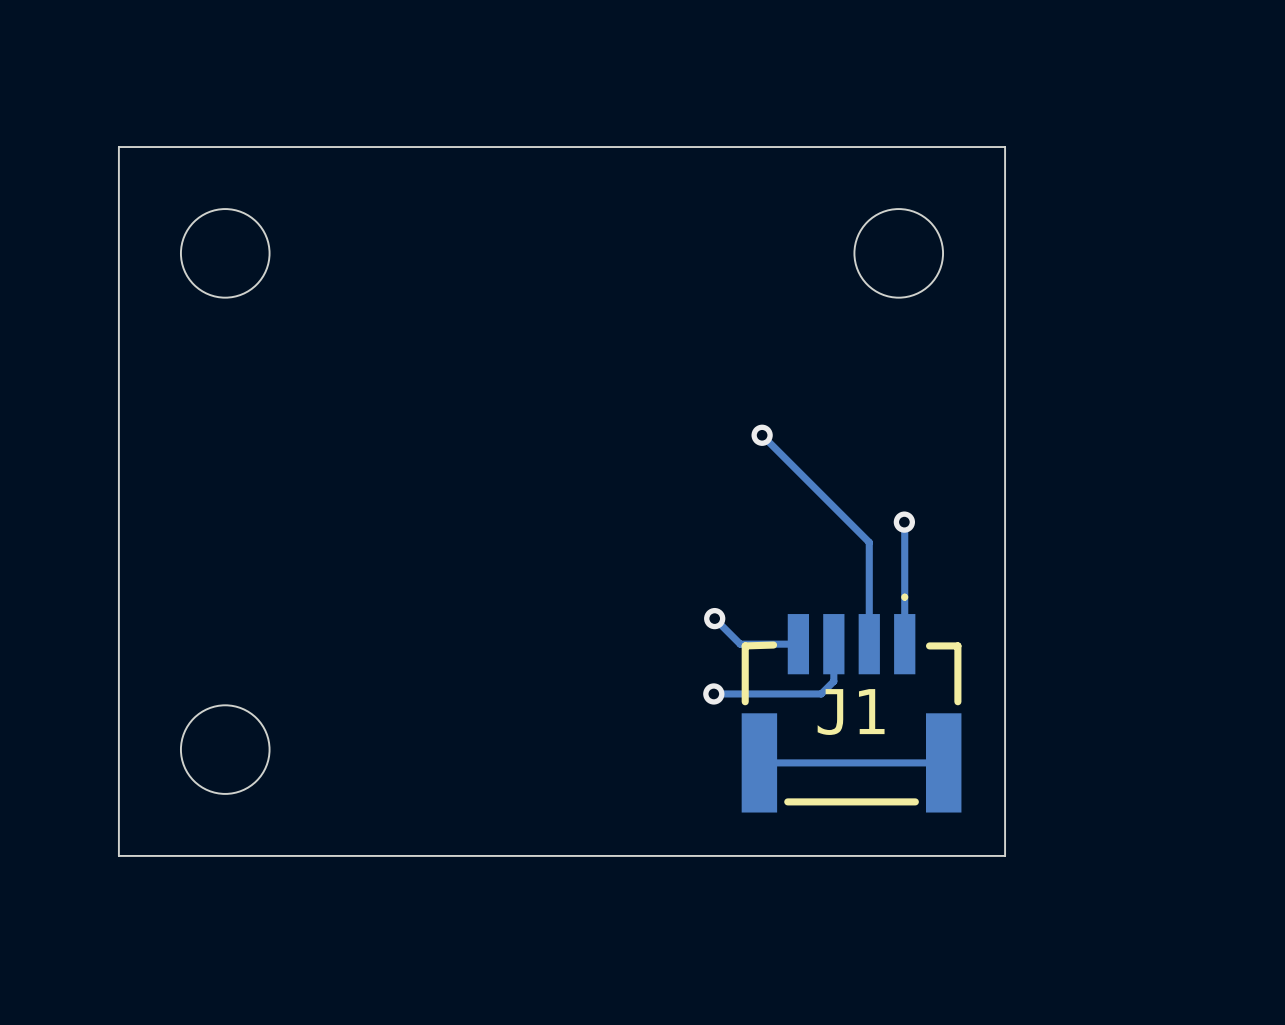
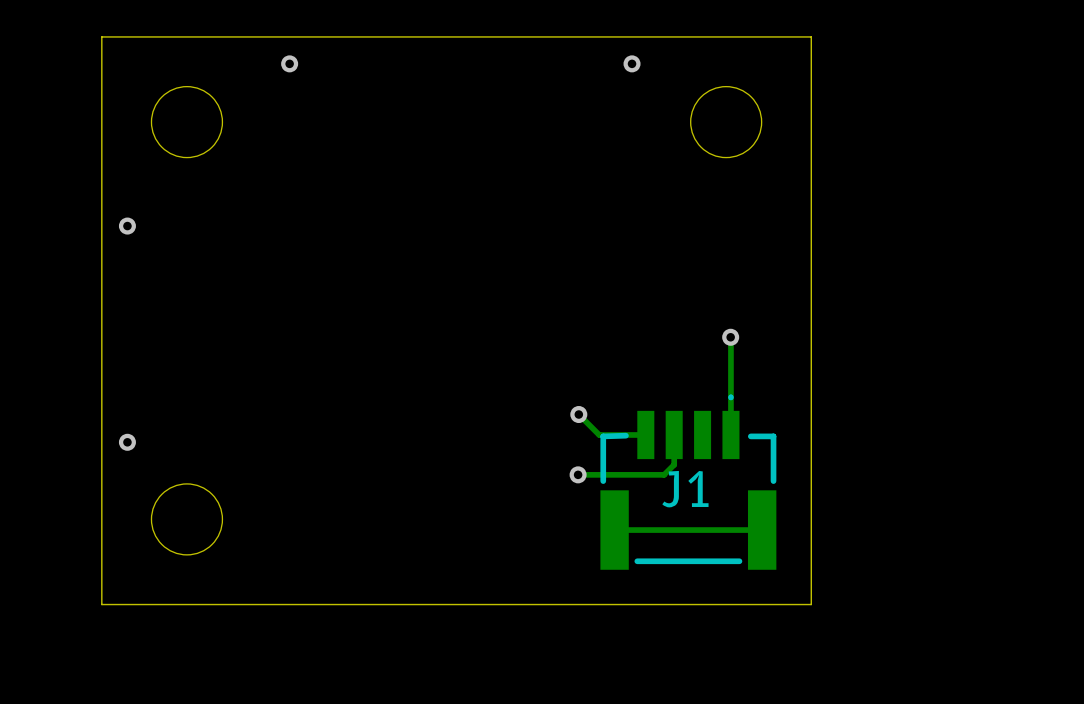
via: none -> (289, 63)
via: none -> (632, 63)
via: none -> (127, 226)
track: (762, 435) (869, 542) (869, 644) -> none
via: (762, 435) -> none
via: none -> (127, 442)

